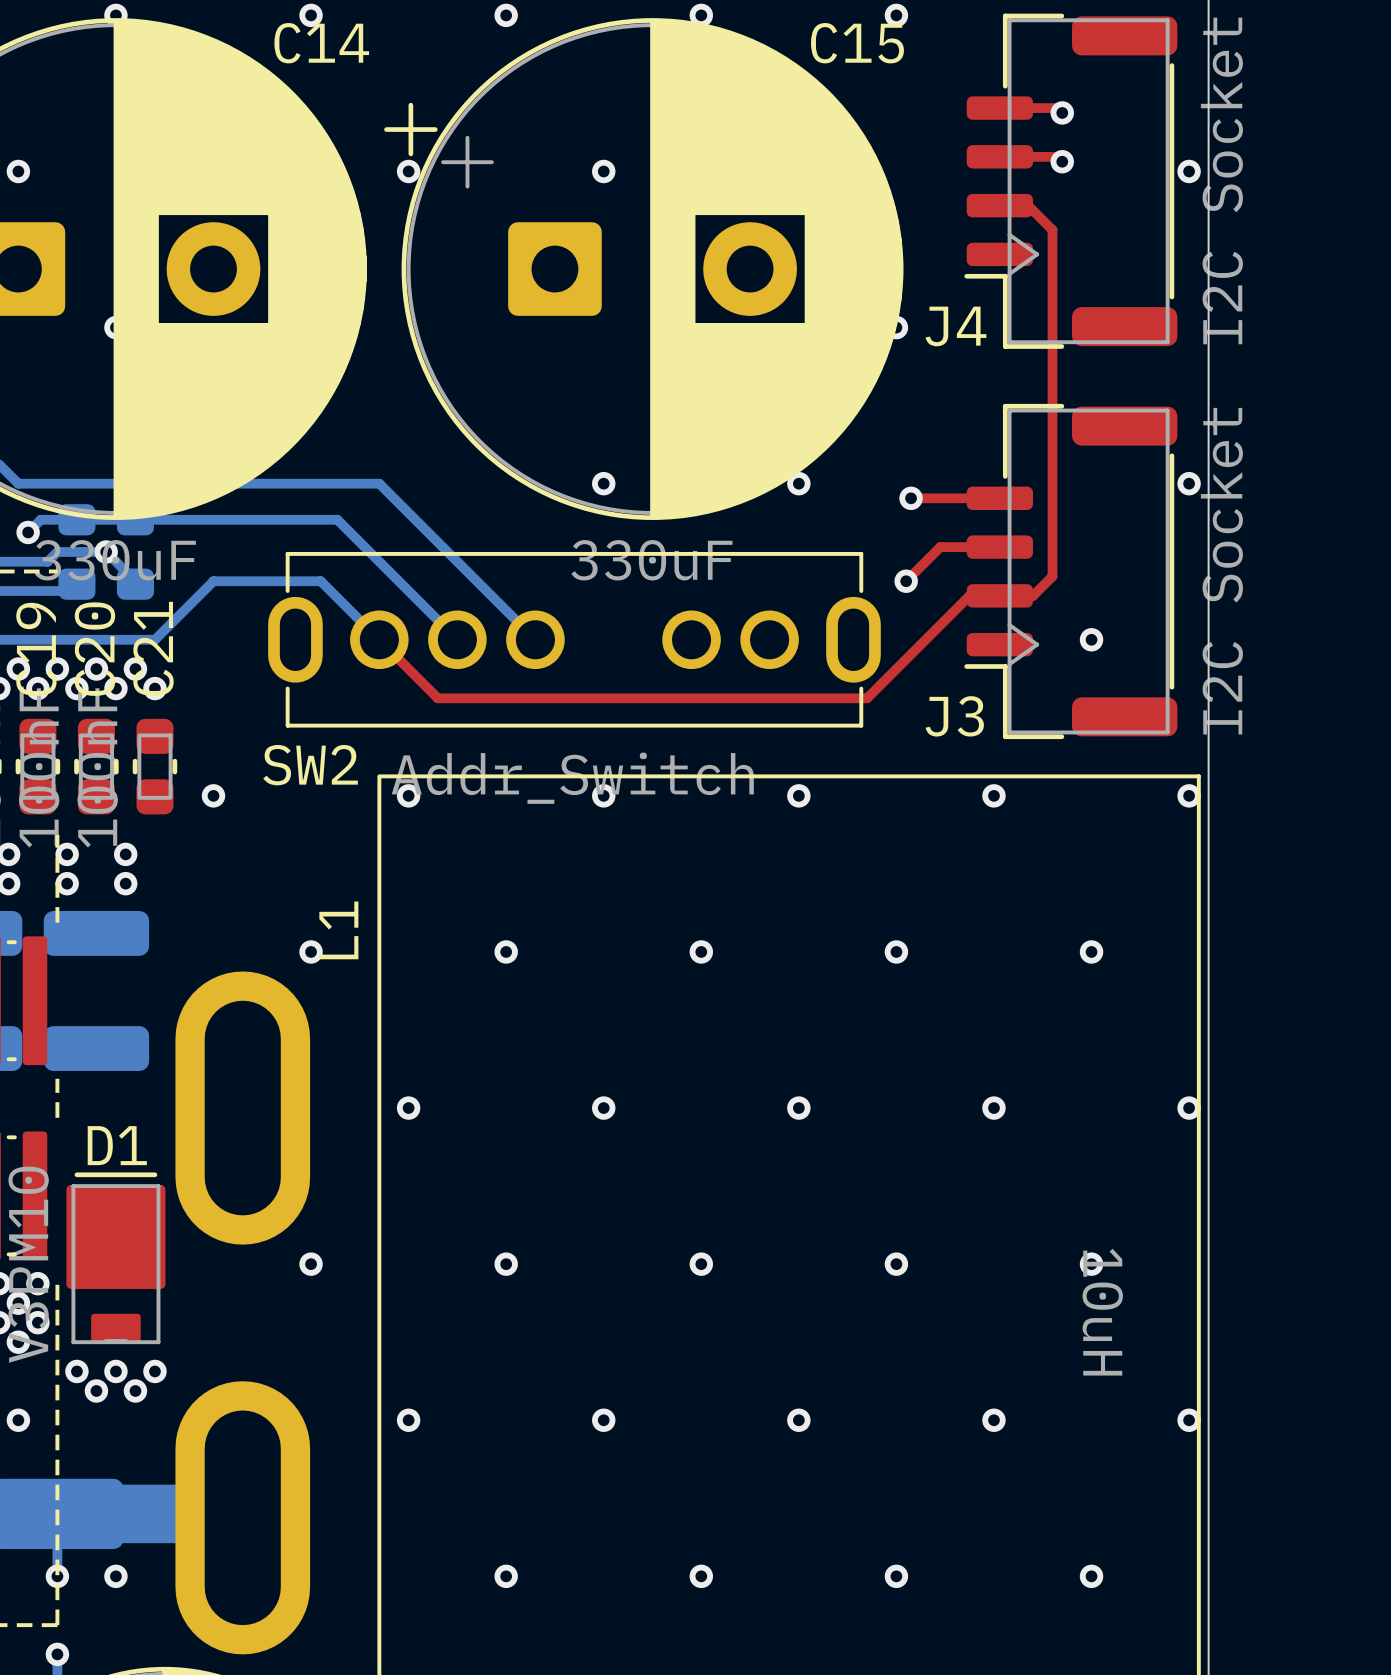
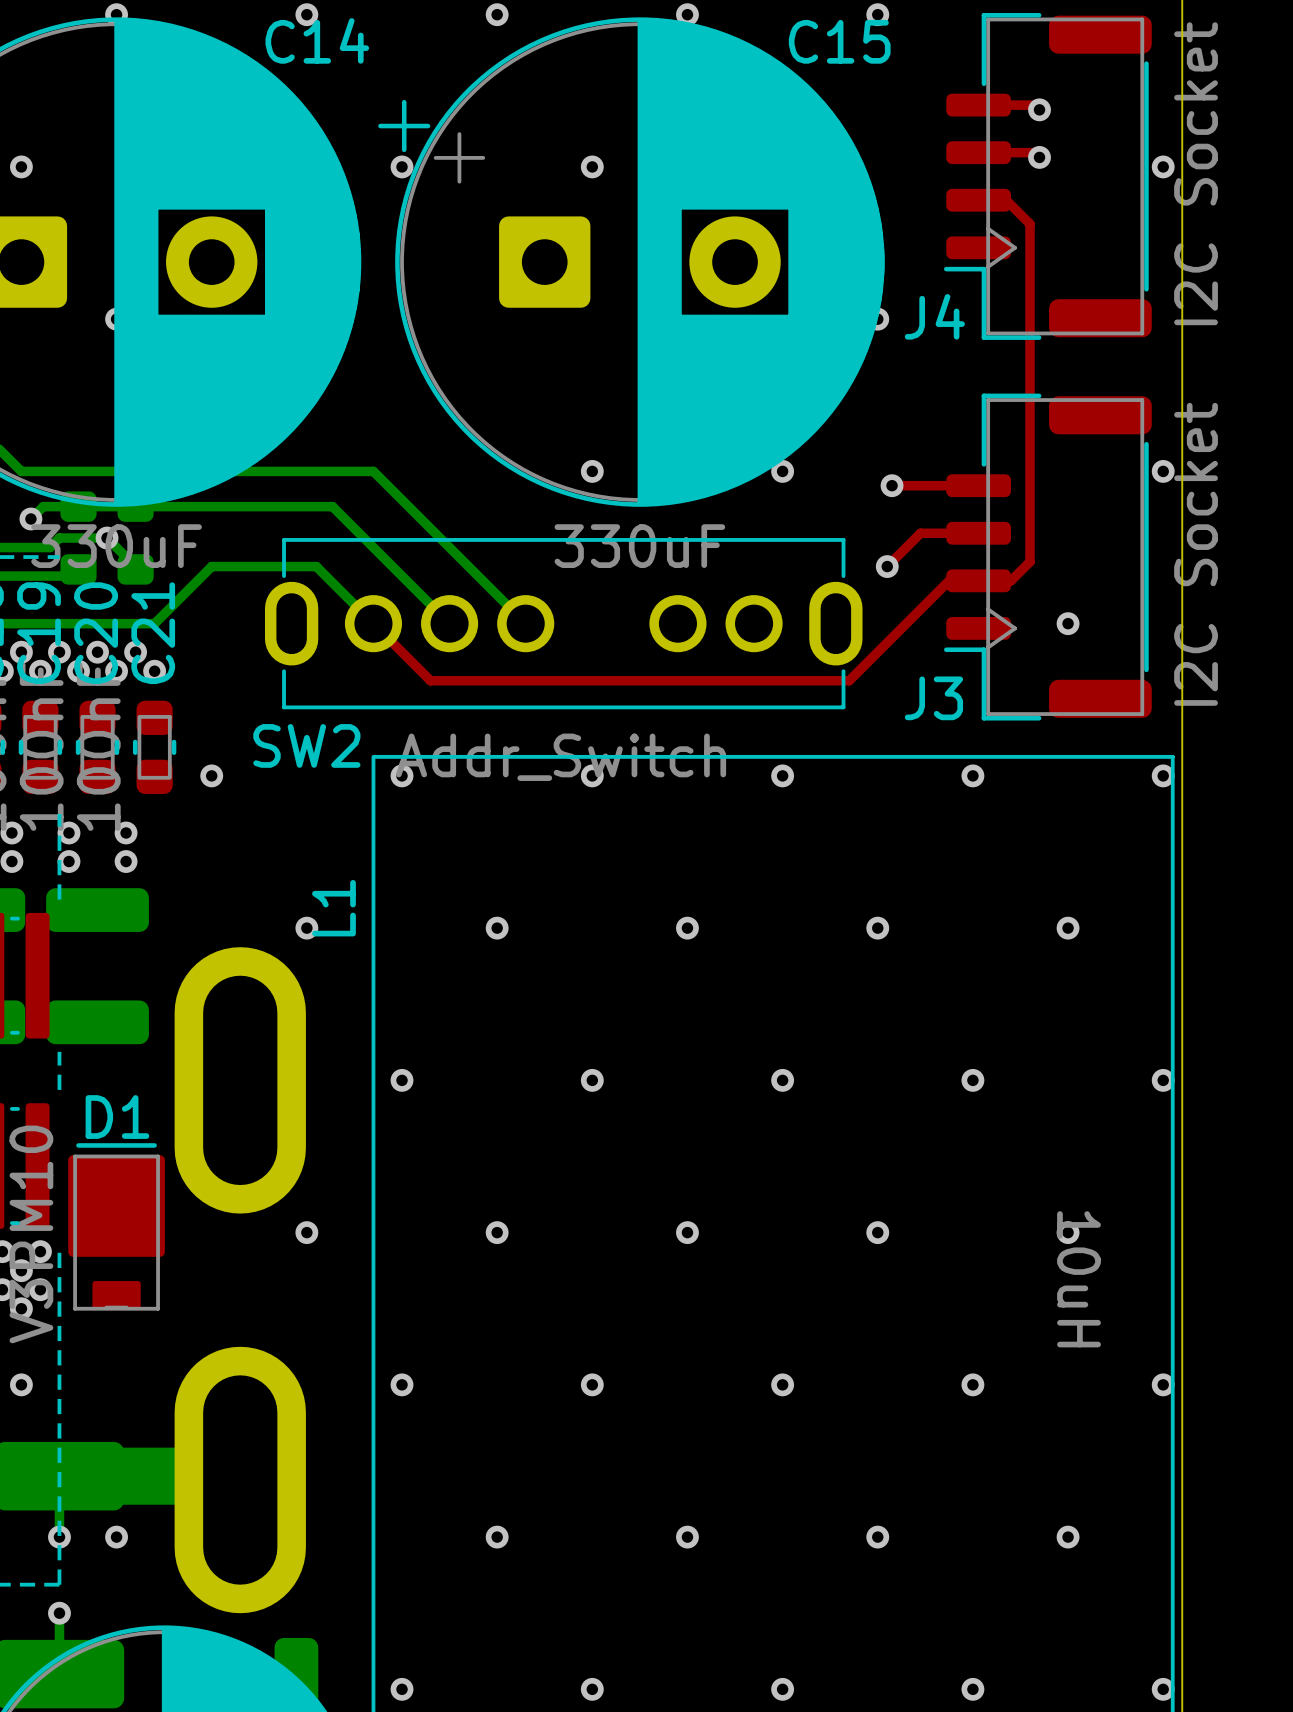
via: (76, 1371) -> none
via: (115, 1371) -> none
via: (154, 1371) -> none
via: (96, 1390) -> none
via: (135, 1390) -> none

